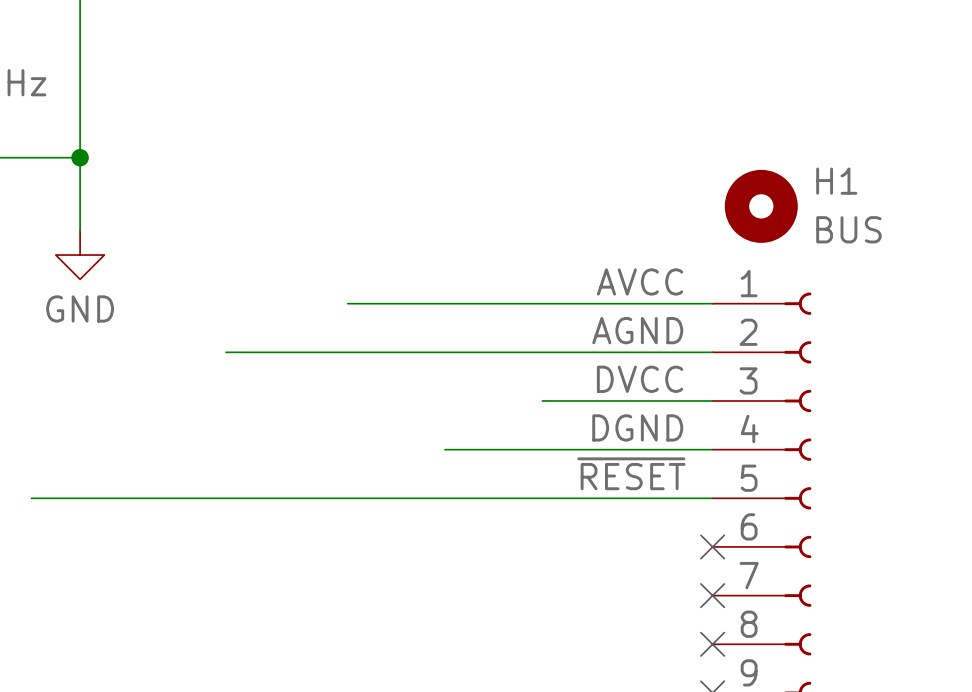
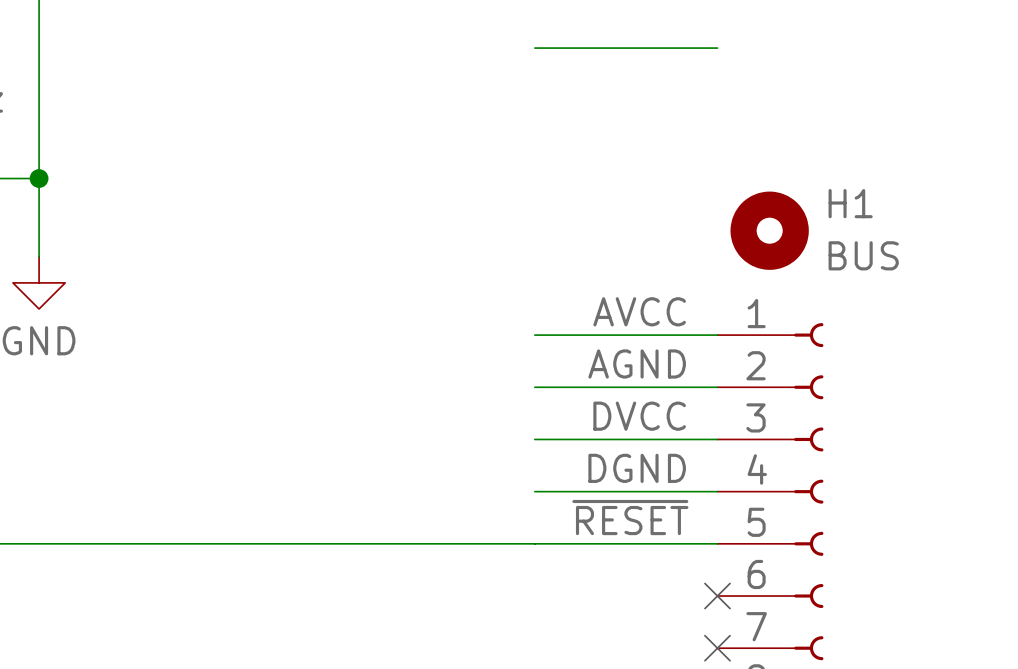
wire: none -> (534, 48) (717, 48)
wire: (347, 303) (542, 303) -> none
wire: (226, 352) (542, 352) -> none
wire: (445, 449) (542, 449) -> none

